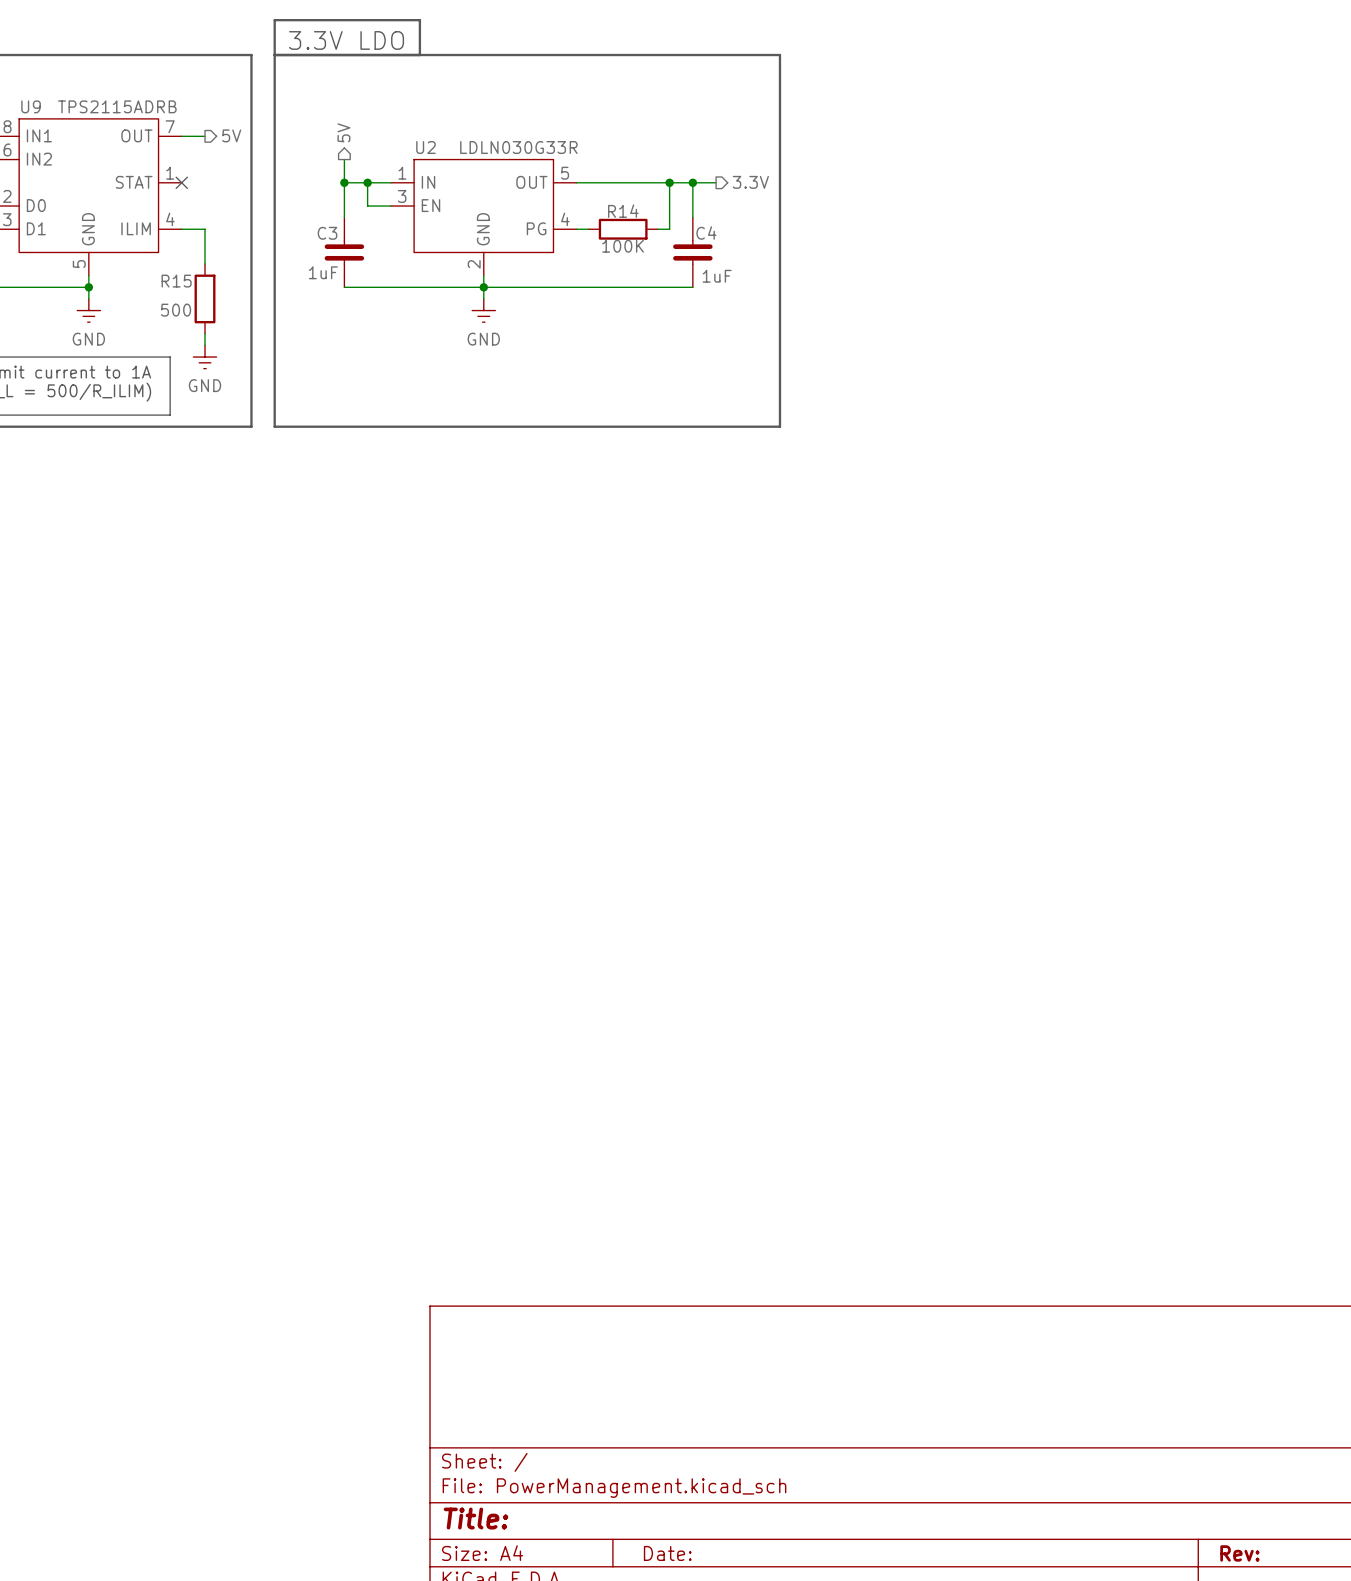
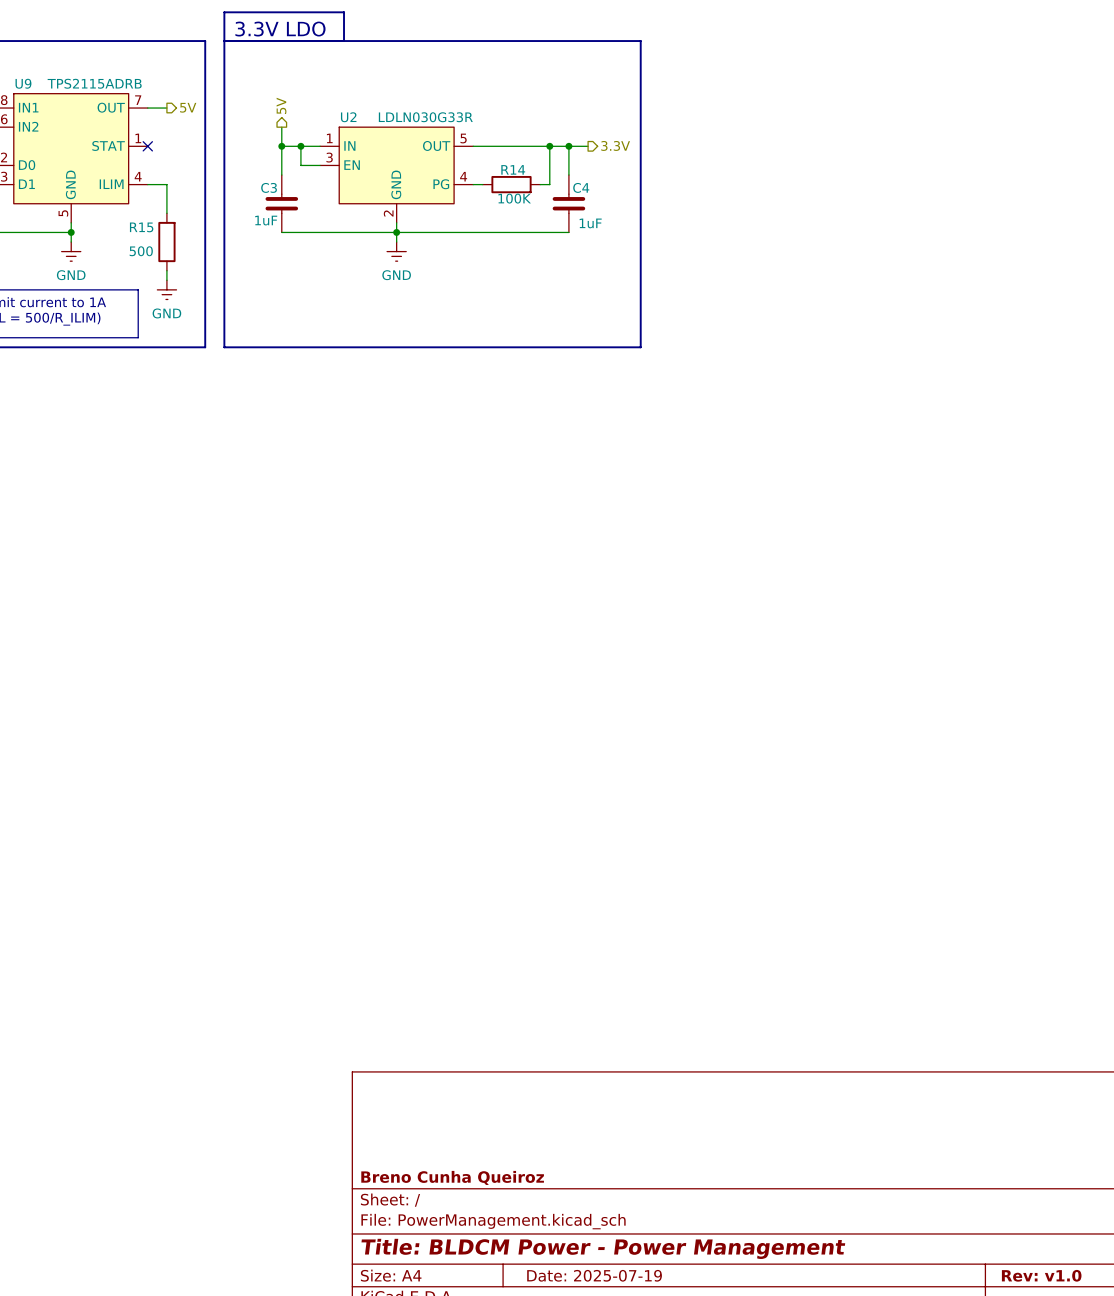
title block: none -> Breno Cunha Queiroz (452, 1177)
title block: Title: (476, 1518) -> Title: BLDCM Power - Power Management (603, 1248)
title block: Date: (667, 1553) -> Date: 2025-07-19 (594, 1275)
title block: Rev: (1239, 1553) -> Rev: v1.0 (1041, 1275)

